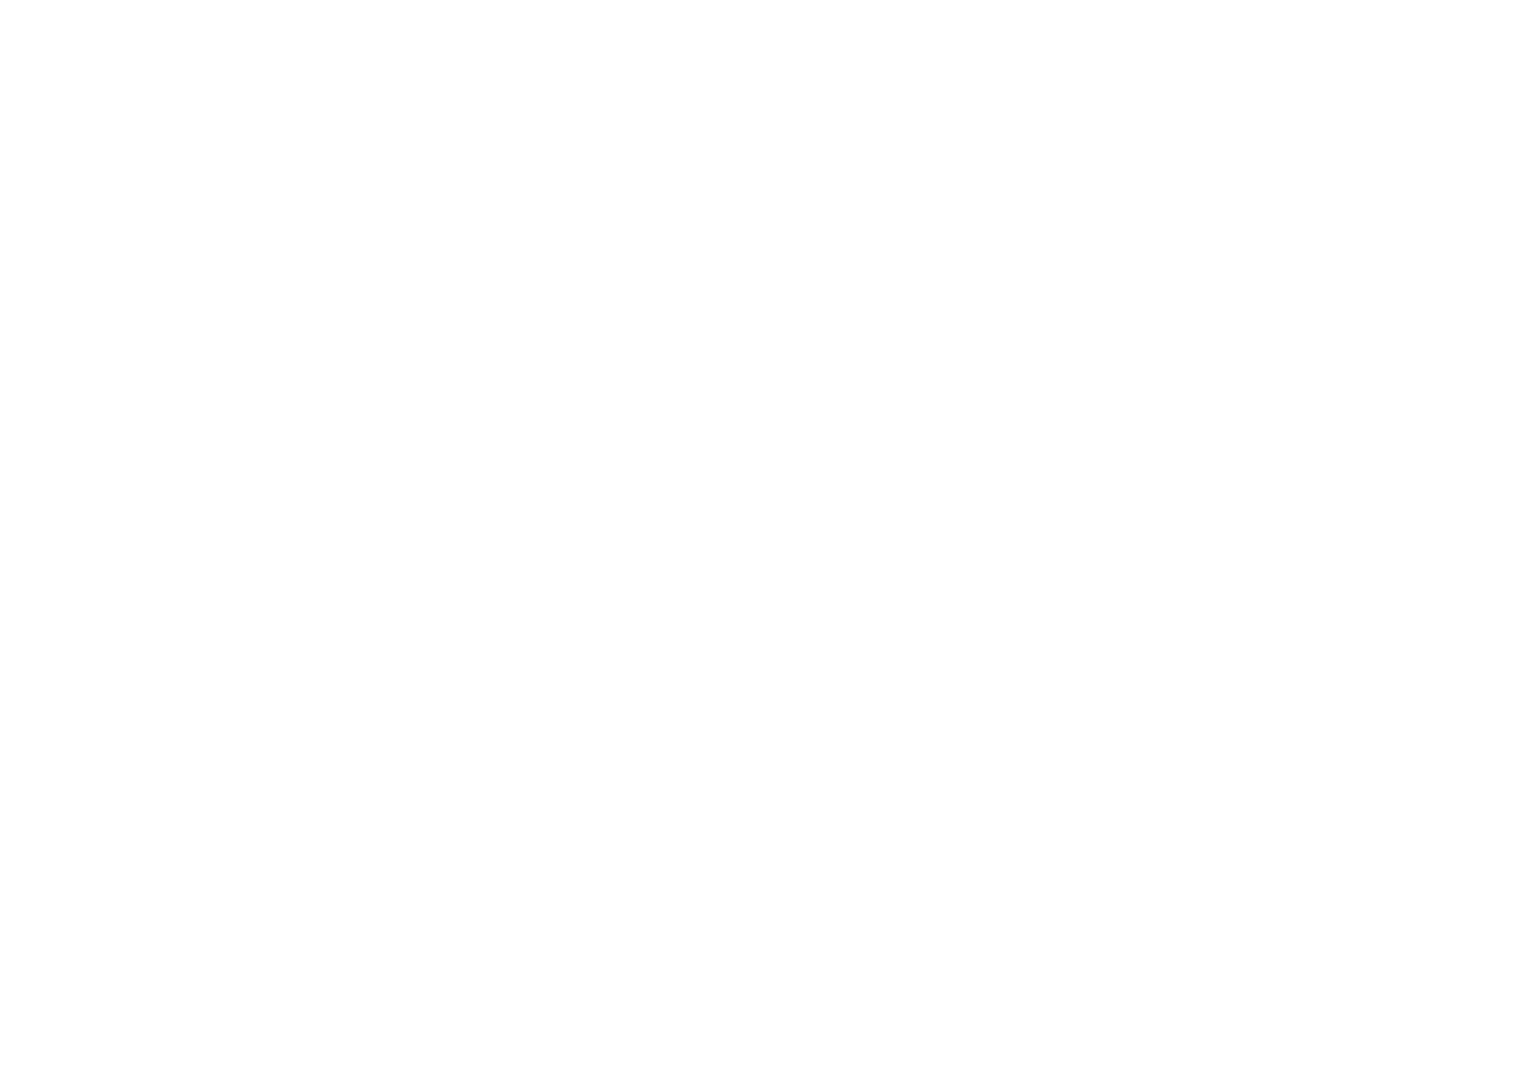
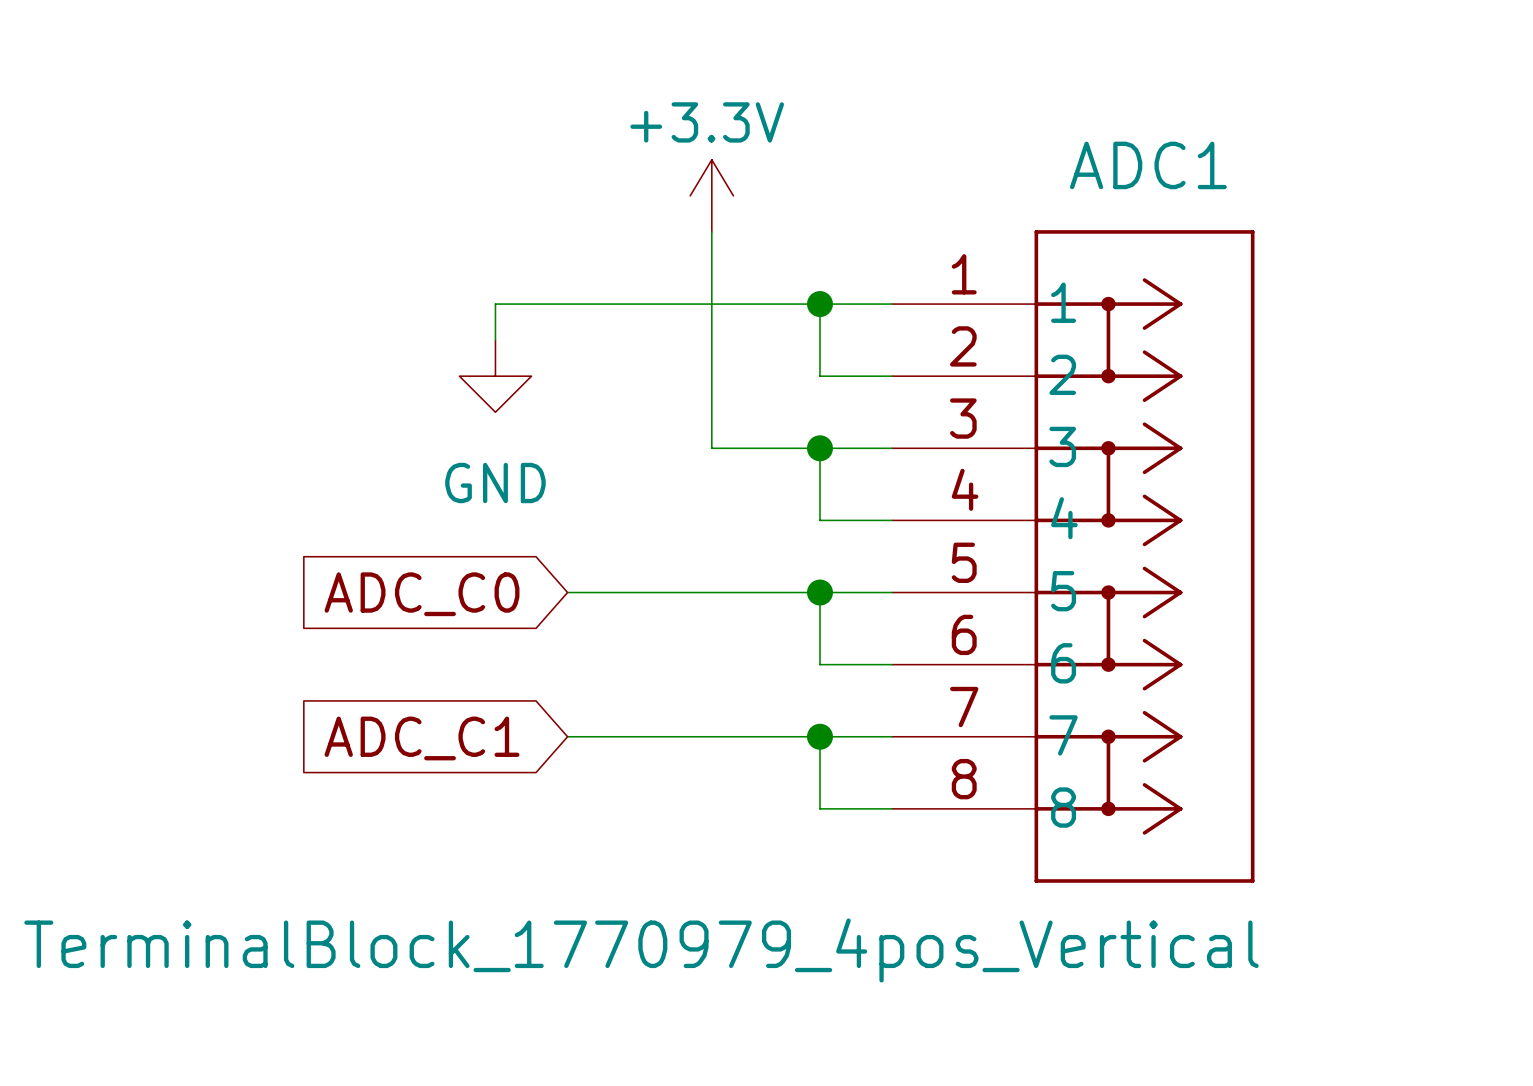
power symbol: none -> +3.3V (711, 195)
wire: none -> (711, 231) (711, 448) (892, 448)
wire: none -> (819, 304) (819, 376) (892, 376)
junction: none -> (819, 304)
wire: none -> (892, 304) (495, 304) (495, 340)
power symbol: none -> GND (495, 376)
wire: none -> (819, 448) (819, 520) (892, 520)
junction: none -> (819, 448)
ADC1: none -> TerminalBlock_1770979_4pos_Vertical (1073, 556)
wire: none -> (567, 592) (892, 592)
wire: none -> (819, 592) (819, 664) (892, 664)
junction: none -> (819, 592)
global label: none -> ADC_C0 (422, 594)
wire: none -> (567, 736) (892, 736)
wire: none -> (819, 736) (819, 808) (892, 808)
junction: none -> (819, 736)
global label: none -> ADC_C1 (422, 738)

